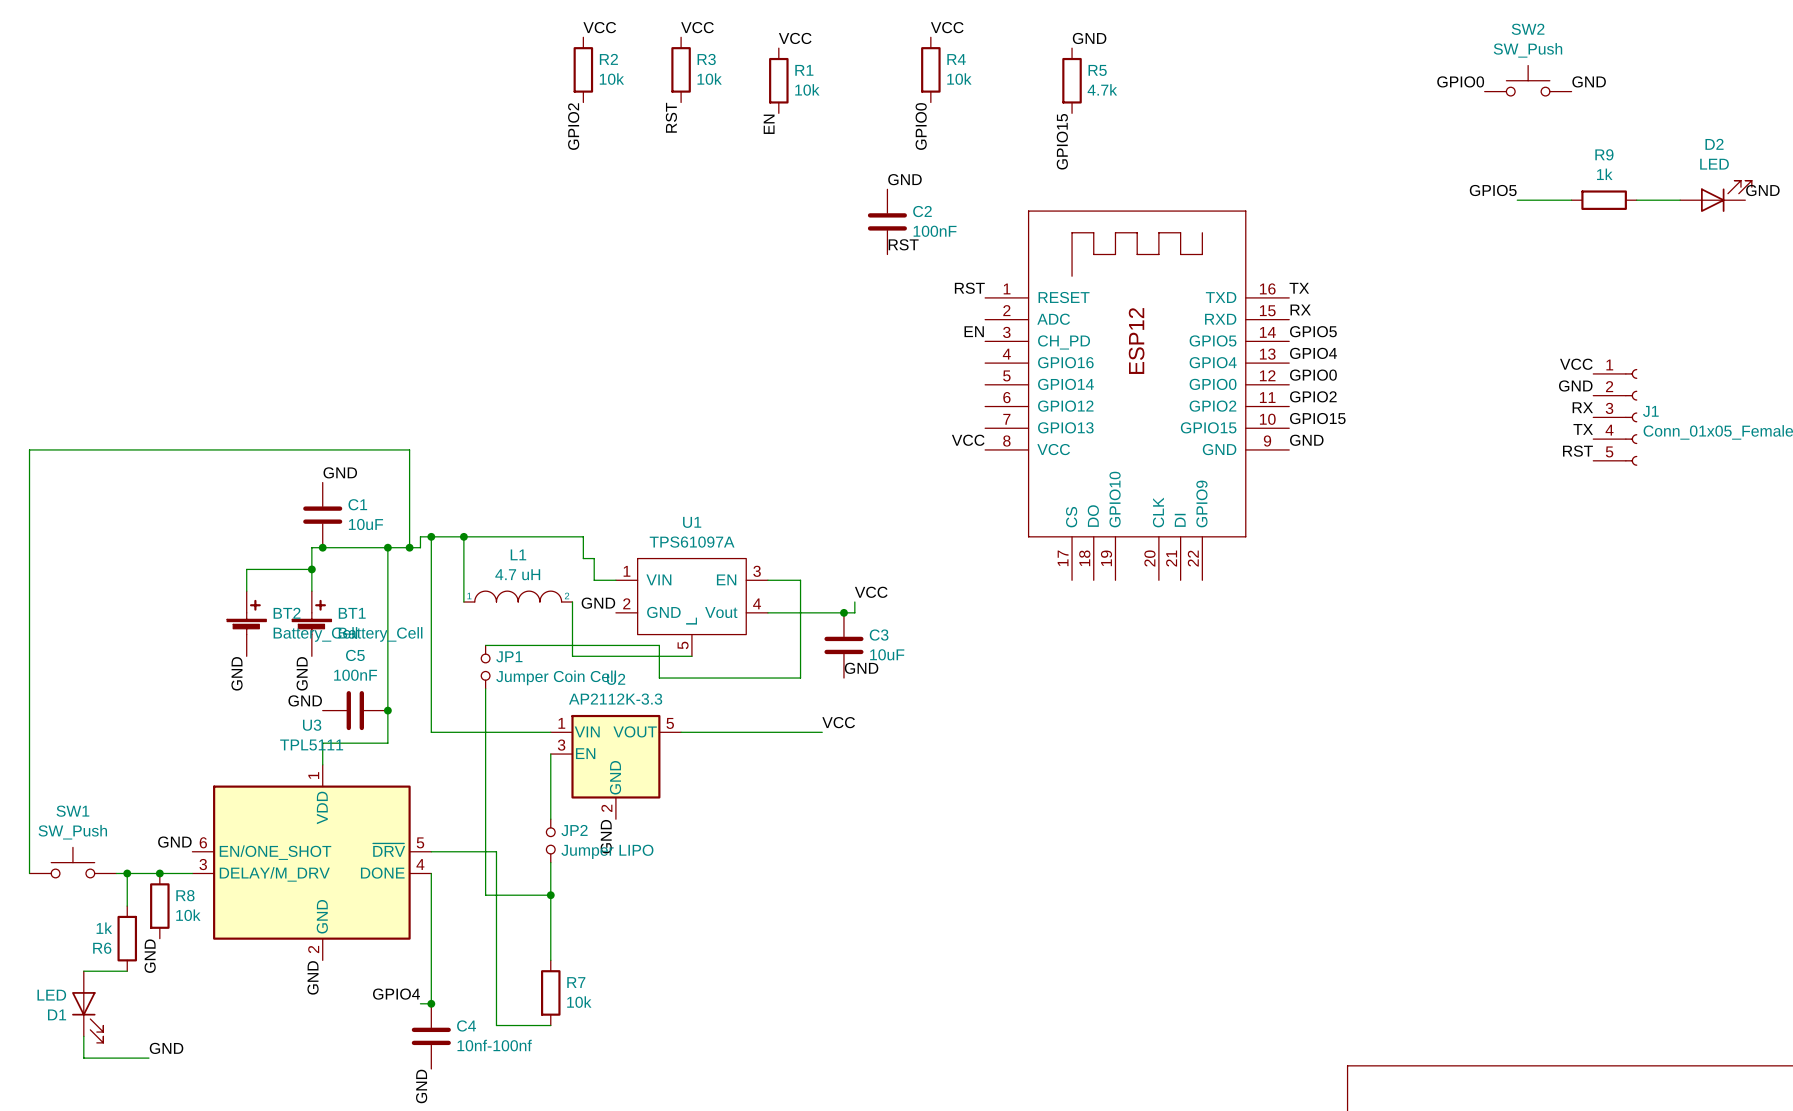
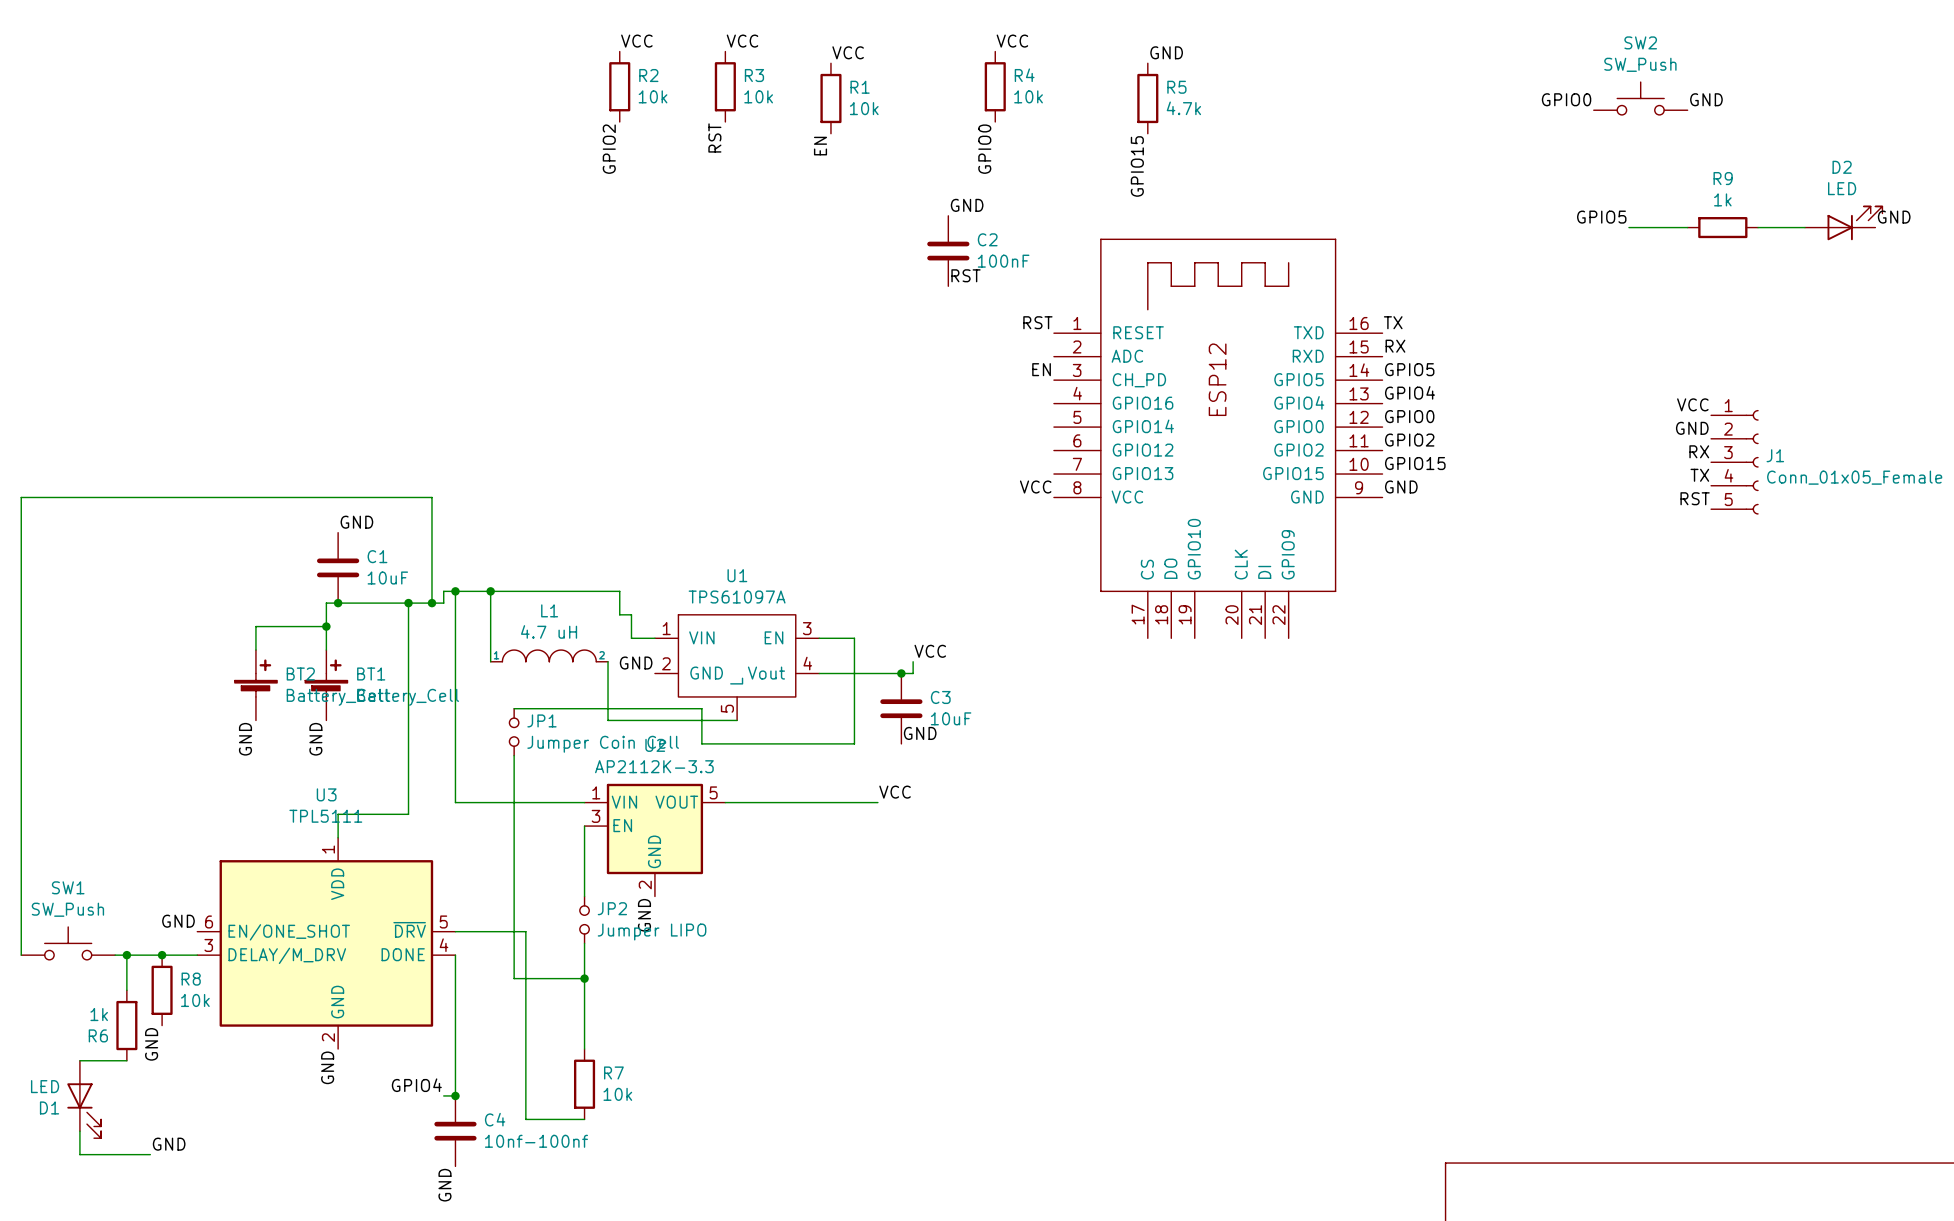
label: GND (305, 700) -> none
C5: 100nF (355, 710) -> none
junction: (387, 710) -> none

